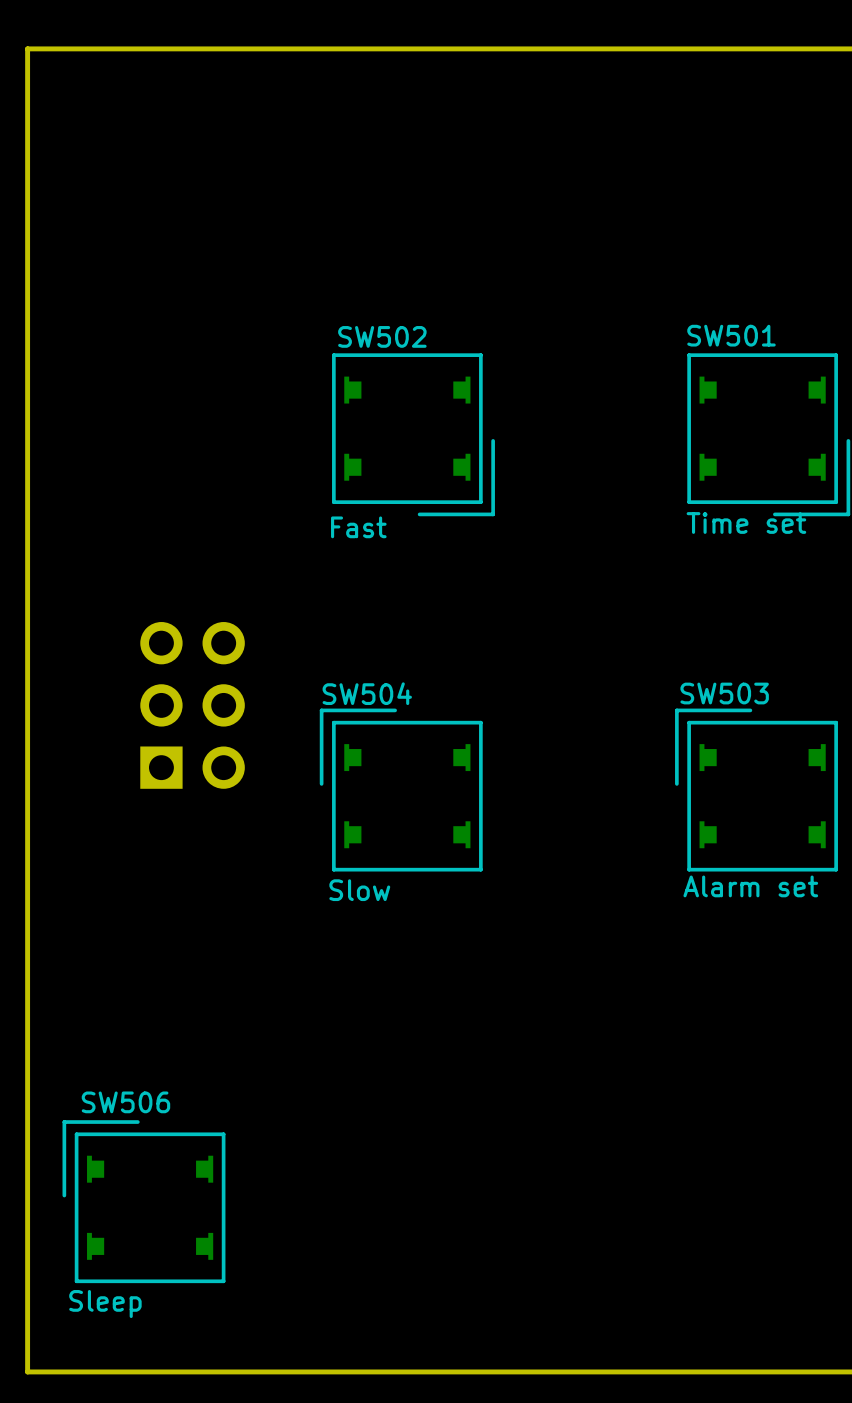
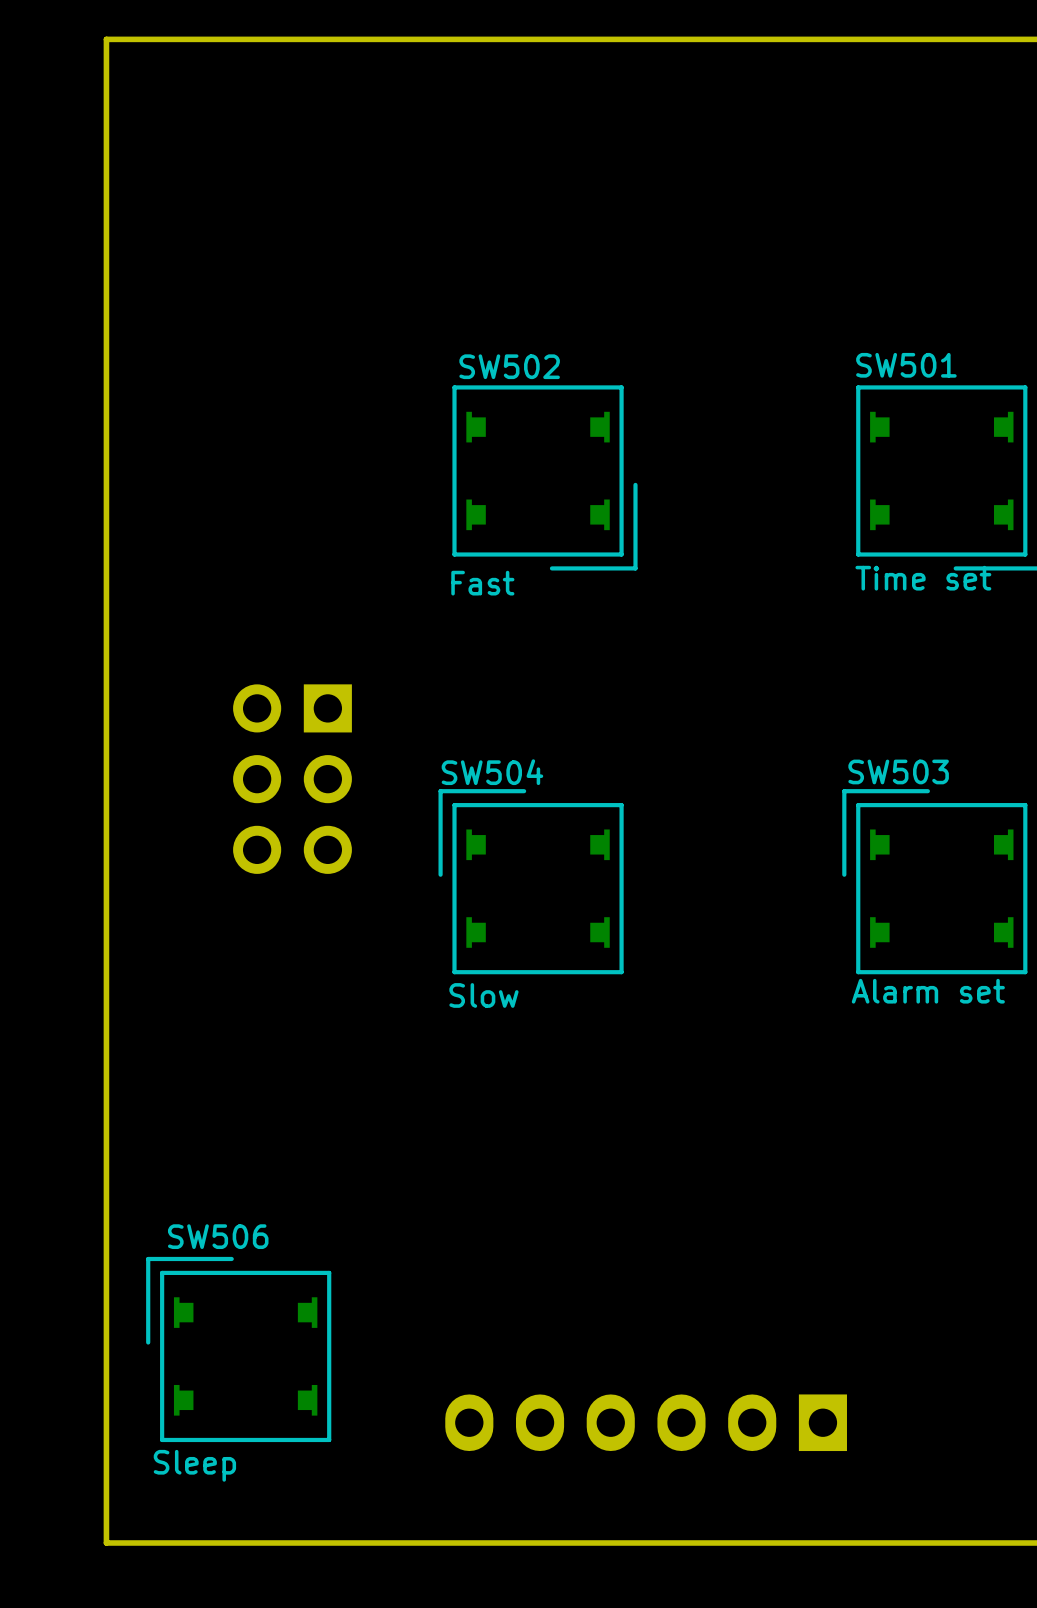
part rotation: 0° (192, 705) -> 180° (292, 779)
part: none -> (646, 1422)

